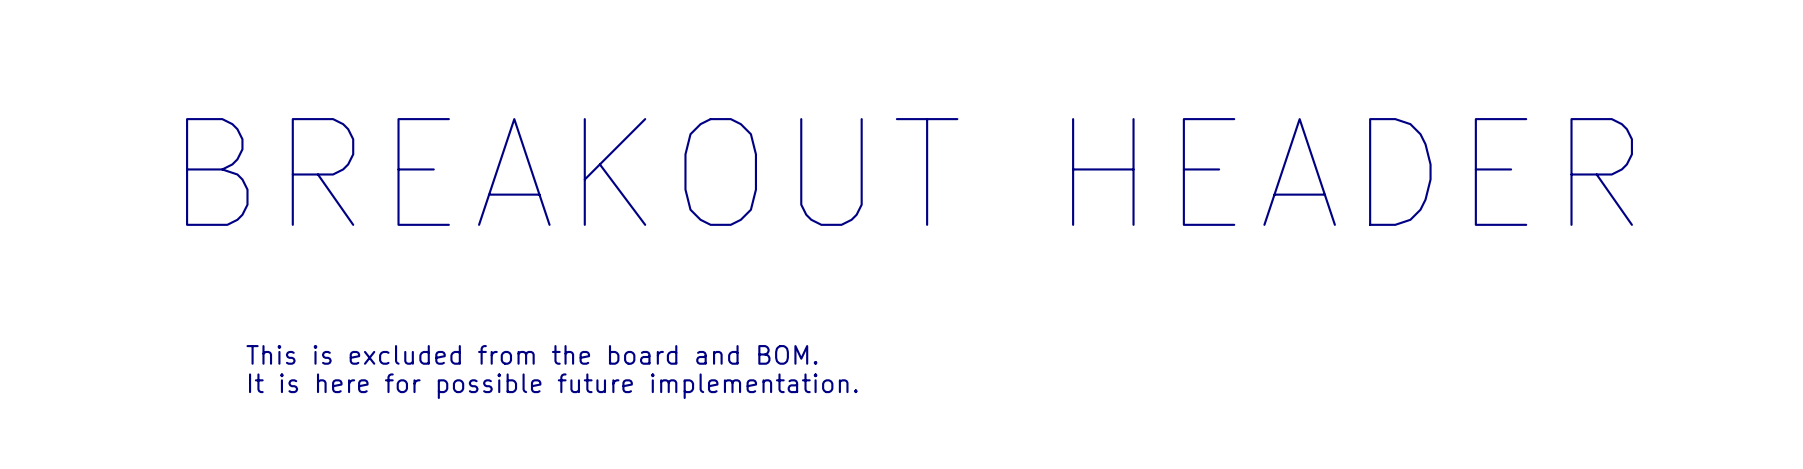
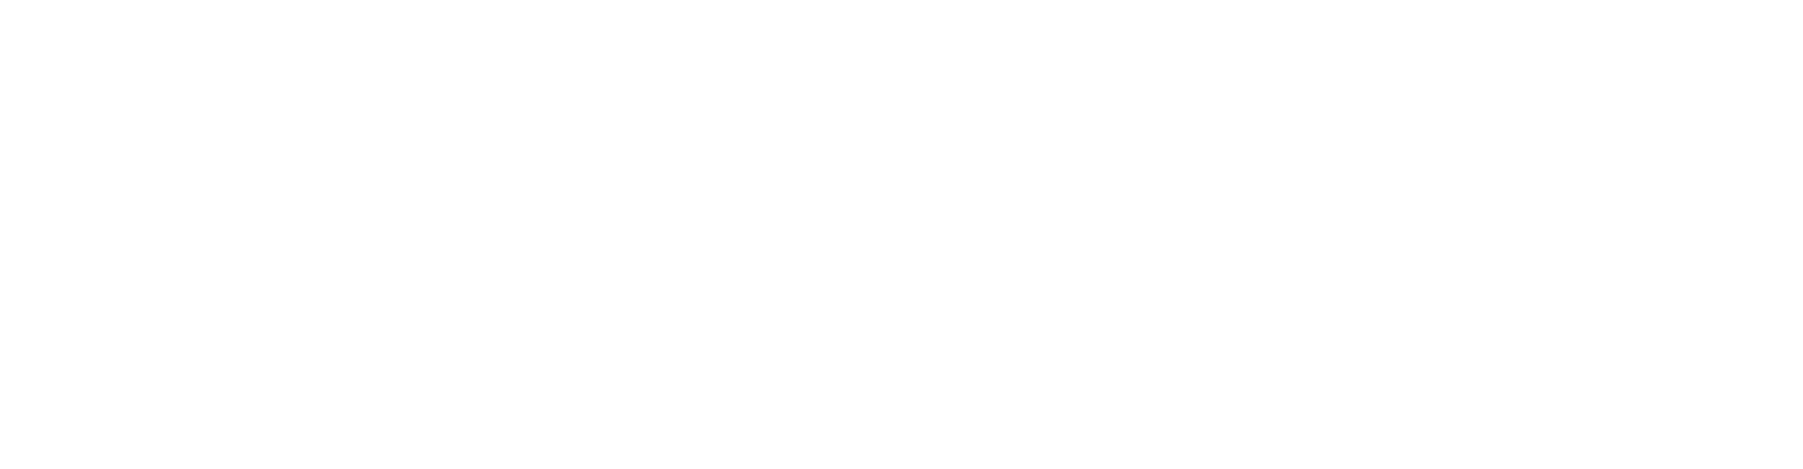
text: BREAKOUT HEADER (909, 171) -> none
text: This is excluded from the board and BOM. (531, 354) -> none
text: It is here for possible future implementation. (553, 386) -> none

